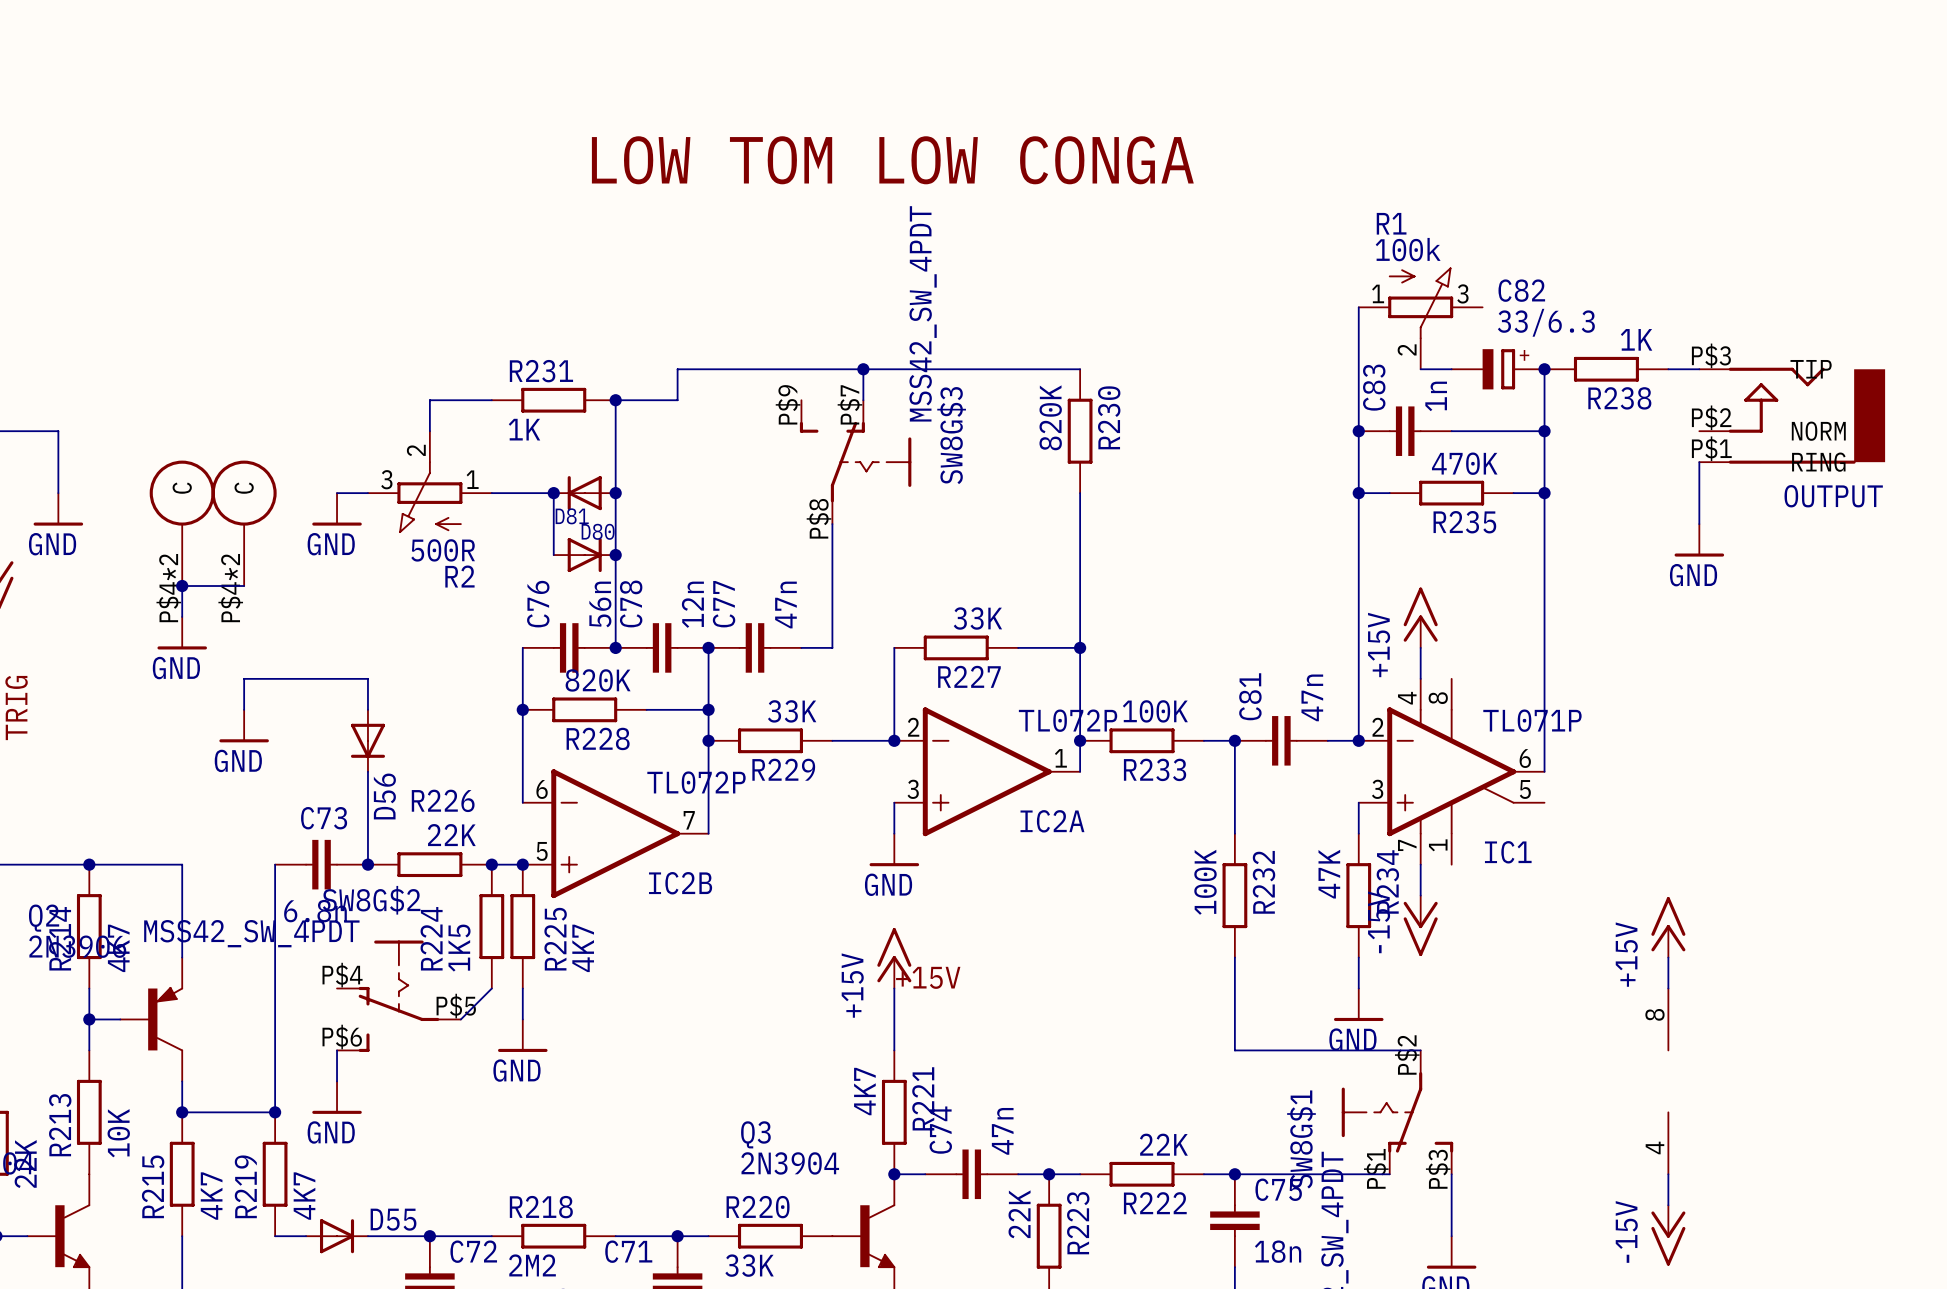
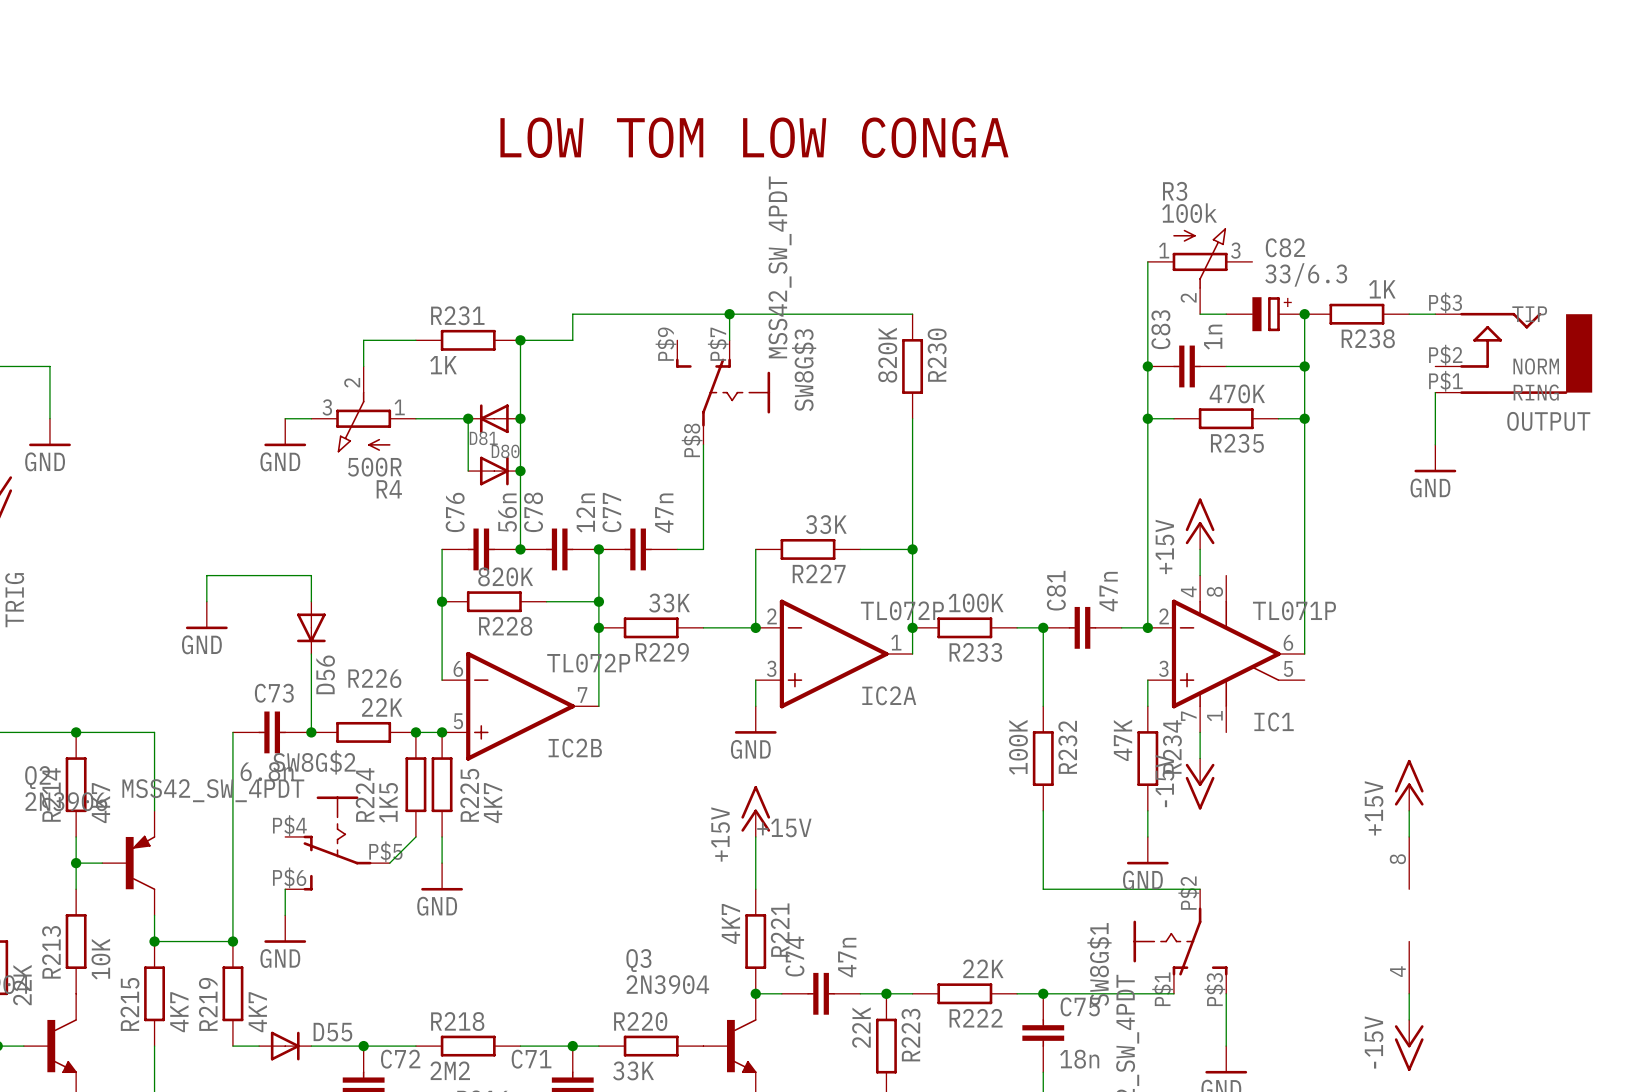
R1 name: R1 (1391, 223) -> R3 (1175, 191)
part: (182, 523) -> none
part: (244, 523) -> none
R2 name: R2 (459, 576) -> R4 (389, 489)
junction: (182, 586) -> none
wire: (244, 586) (182, 586) (182, 616) -> none
power symbol: GND (182, 633) -> none

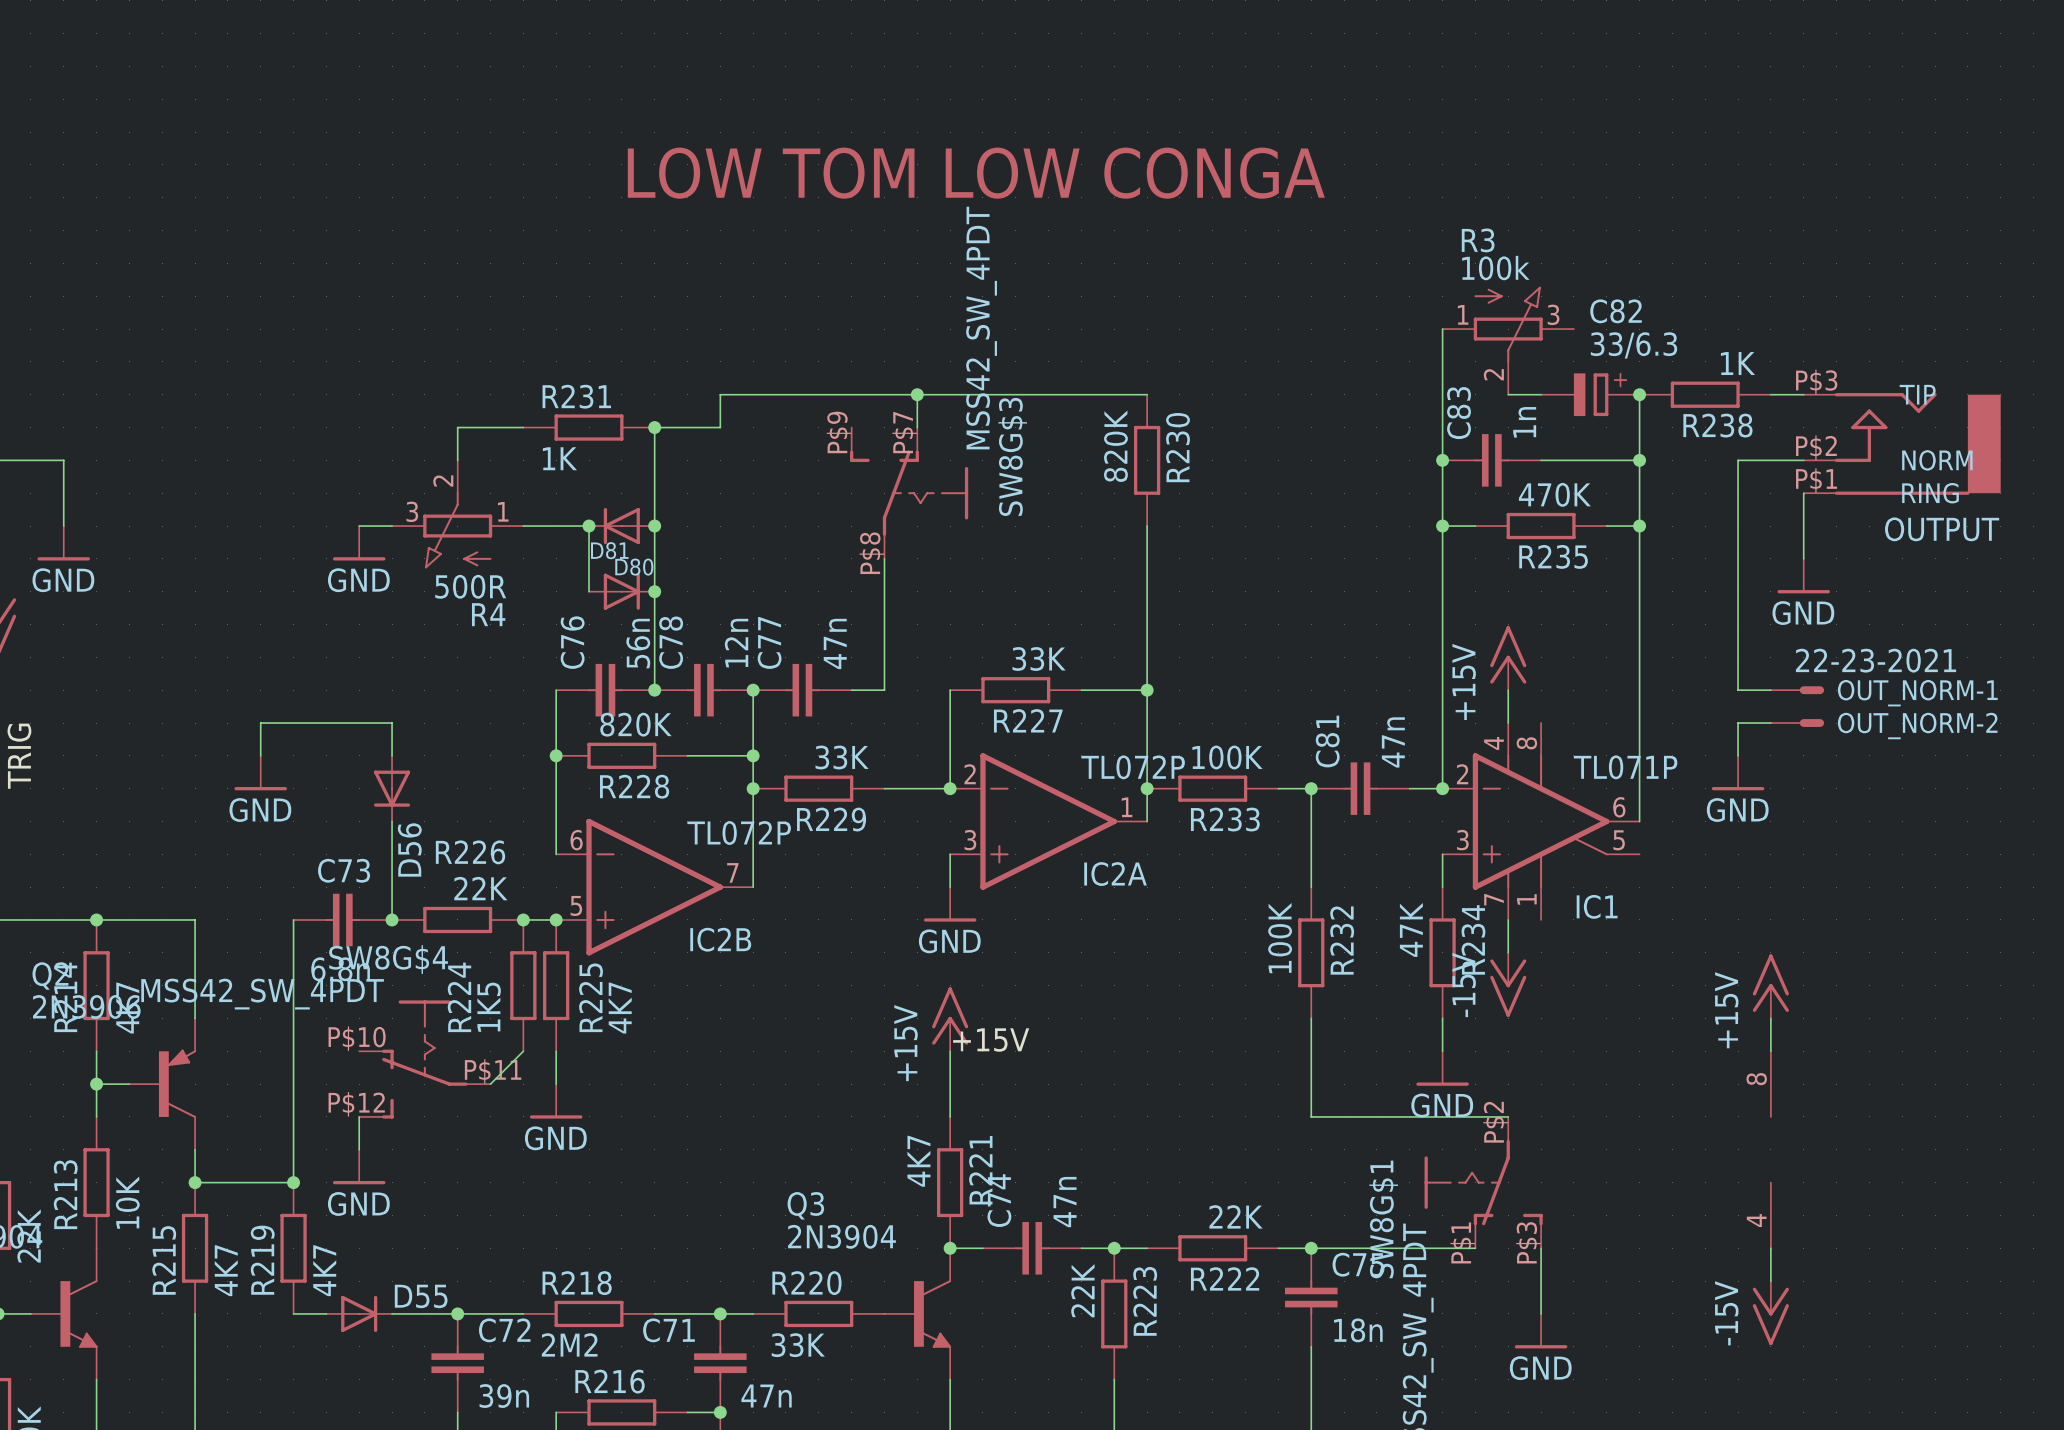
wire: none -> (1803, 460) (1738, 460) (1738, 690) (1770, 690)
OUT_NORM-1: none -> 22-23-2021 (1797, 690)
wire: none -> (1770, 723) (1738, 723) (1738, 755)
OUT_NORM-2: none -> (1797, 723)
power symbol: none -> GND (1738, 773)
SW8G$2 name: SW8G$2 (314, 762) -> SW8G$4 (388, 959)
SW8G$2 pin number: P$4 (289, 825) -> P$10 (357, 1038)
SW8G$2 pin number: P$5 (385, 851) -> P$11 (493, 1071)
SW8G$2 pin number: P$6 (289, 877) -> P$12 (356, 1104)

